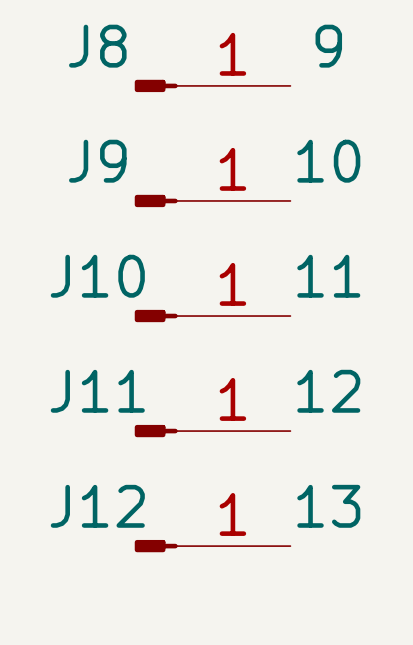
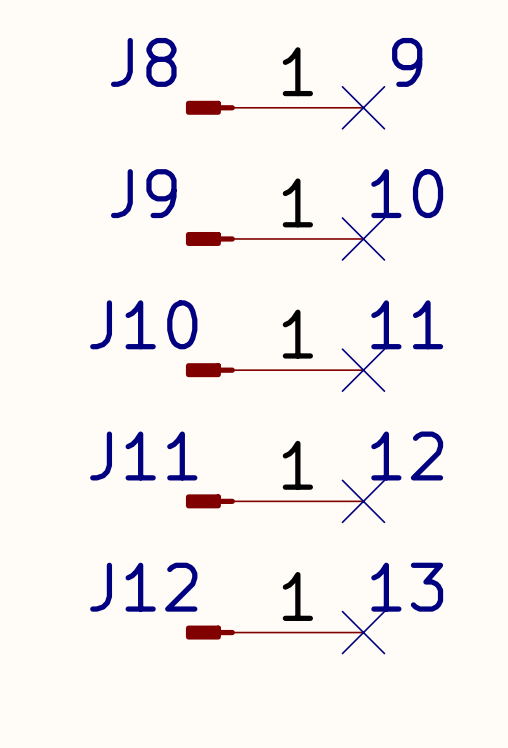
no-connect mark: none -> (363, 107)
no-connect mark: none -> (363, 238)
no-connect mark: none -> (363, 370)
no-connect mark: none -> (363, 501)
no-connect mark: none -> (363, 632)

